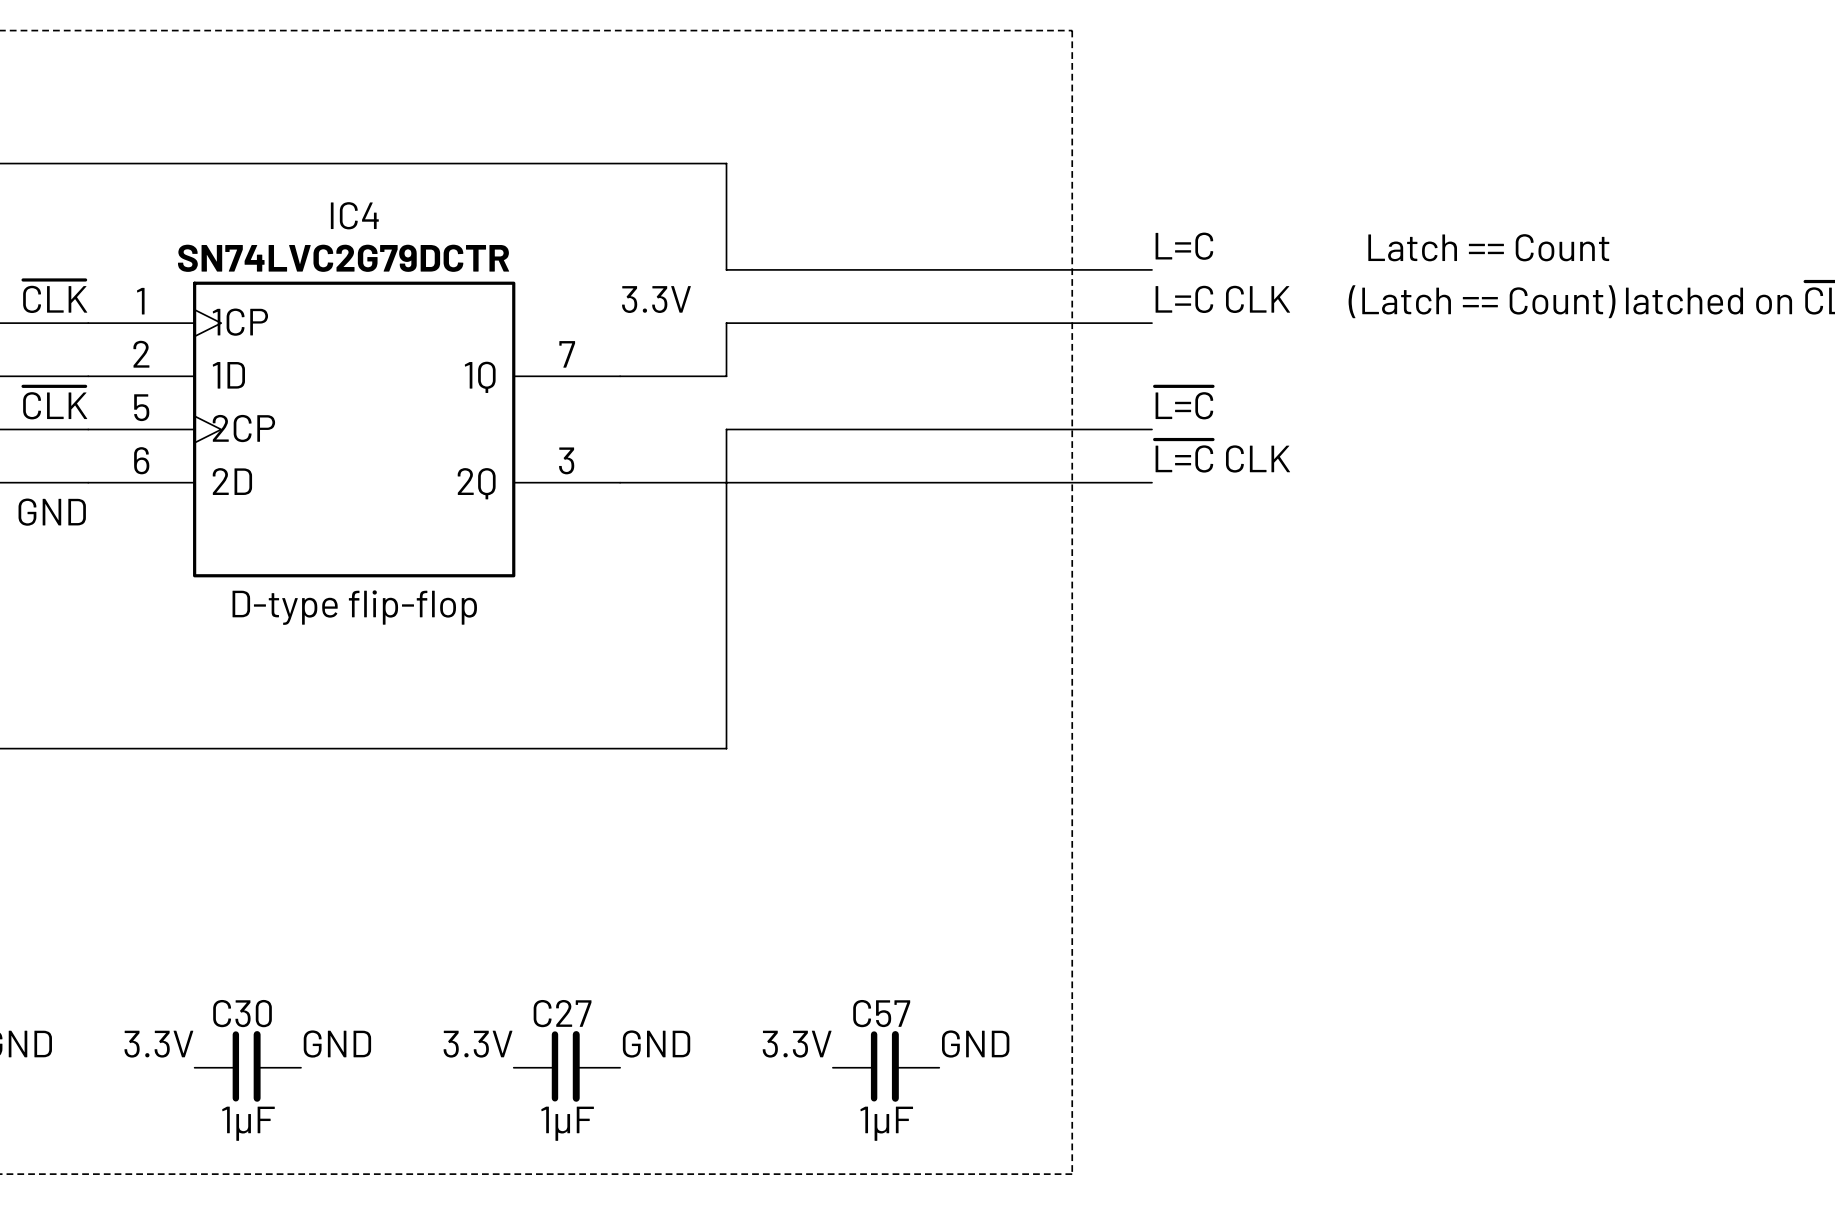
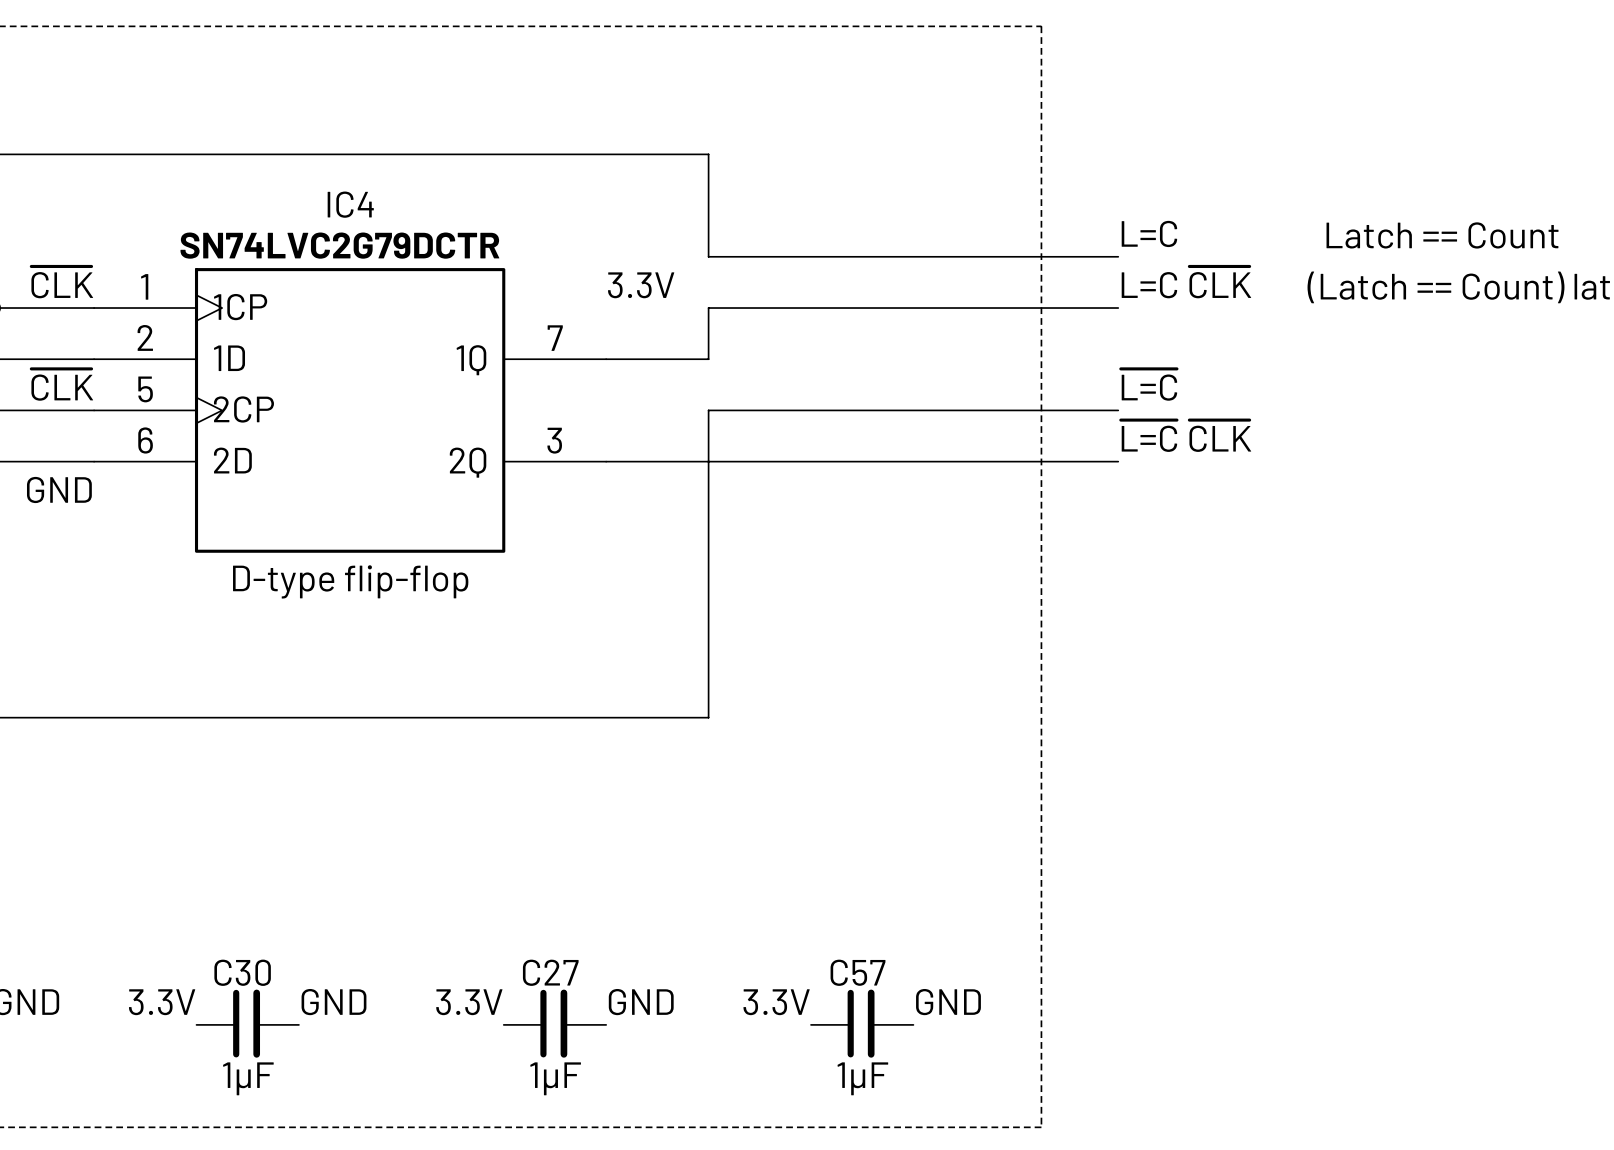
label: L=C CLK (1222, 299) -> L=C ~{CLK} (1186, 282)
label: ~{L=C} CLK (1222, 456) -> ~{L=C} ~{CLK} (1185, 436)

